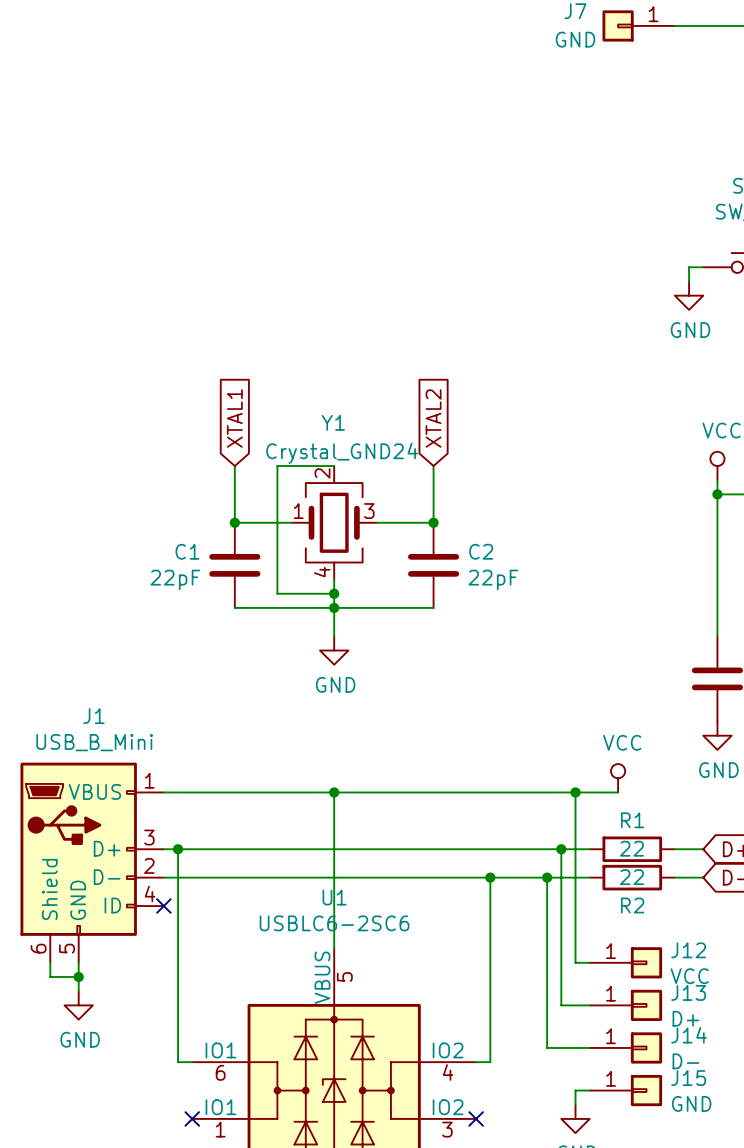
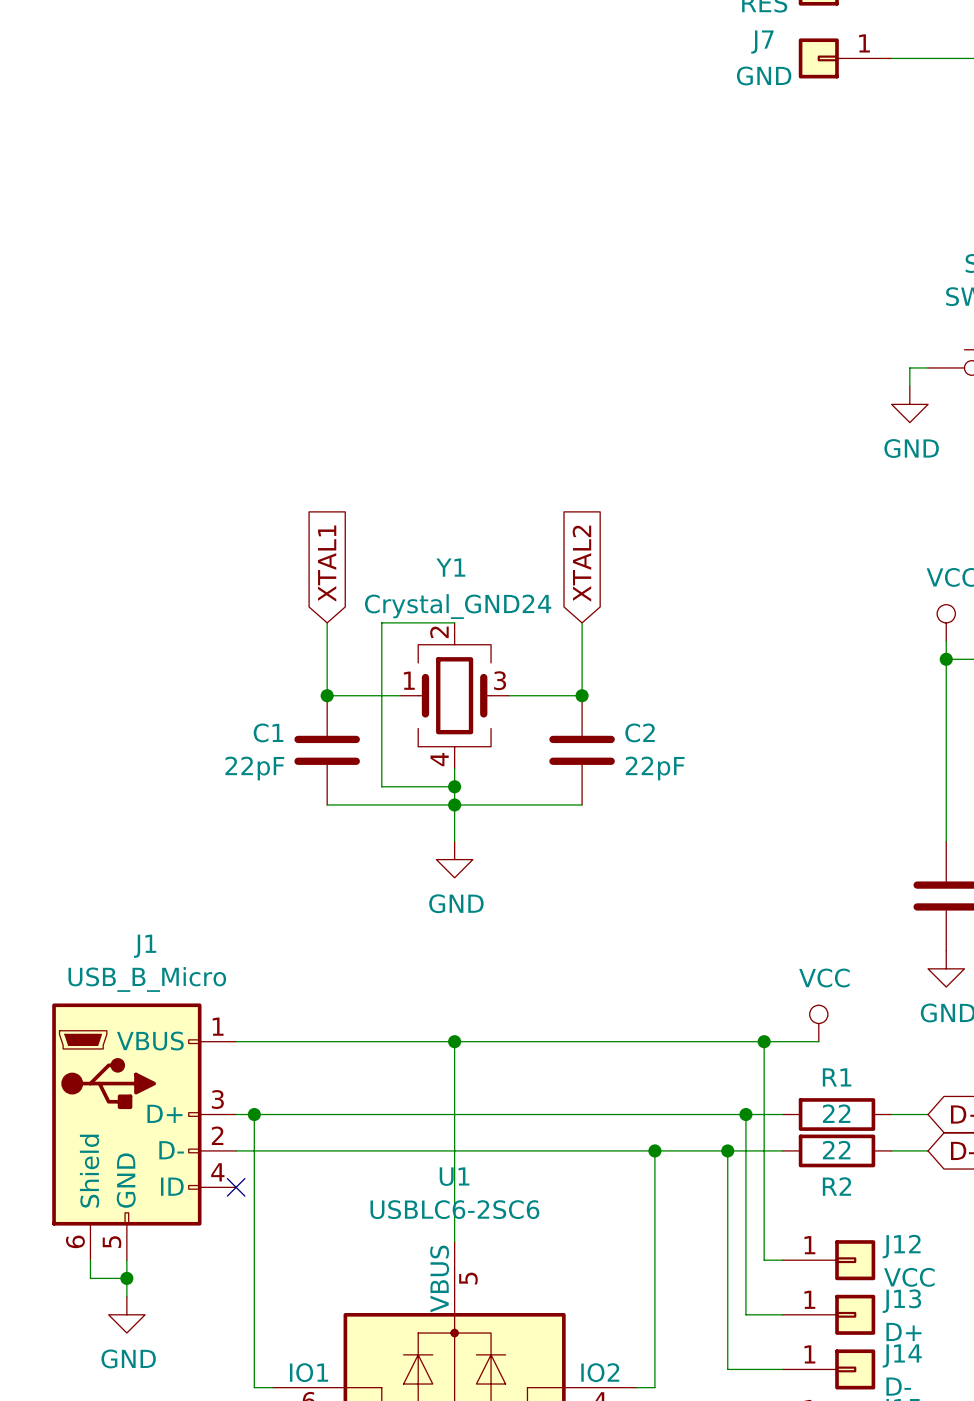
J1 value: USB_B_Mini (94, 742) -> USB_B_Micro (147, 979)

